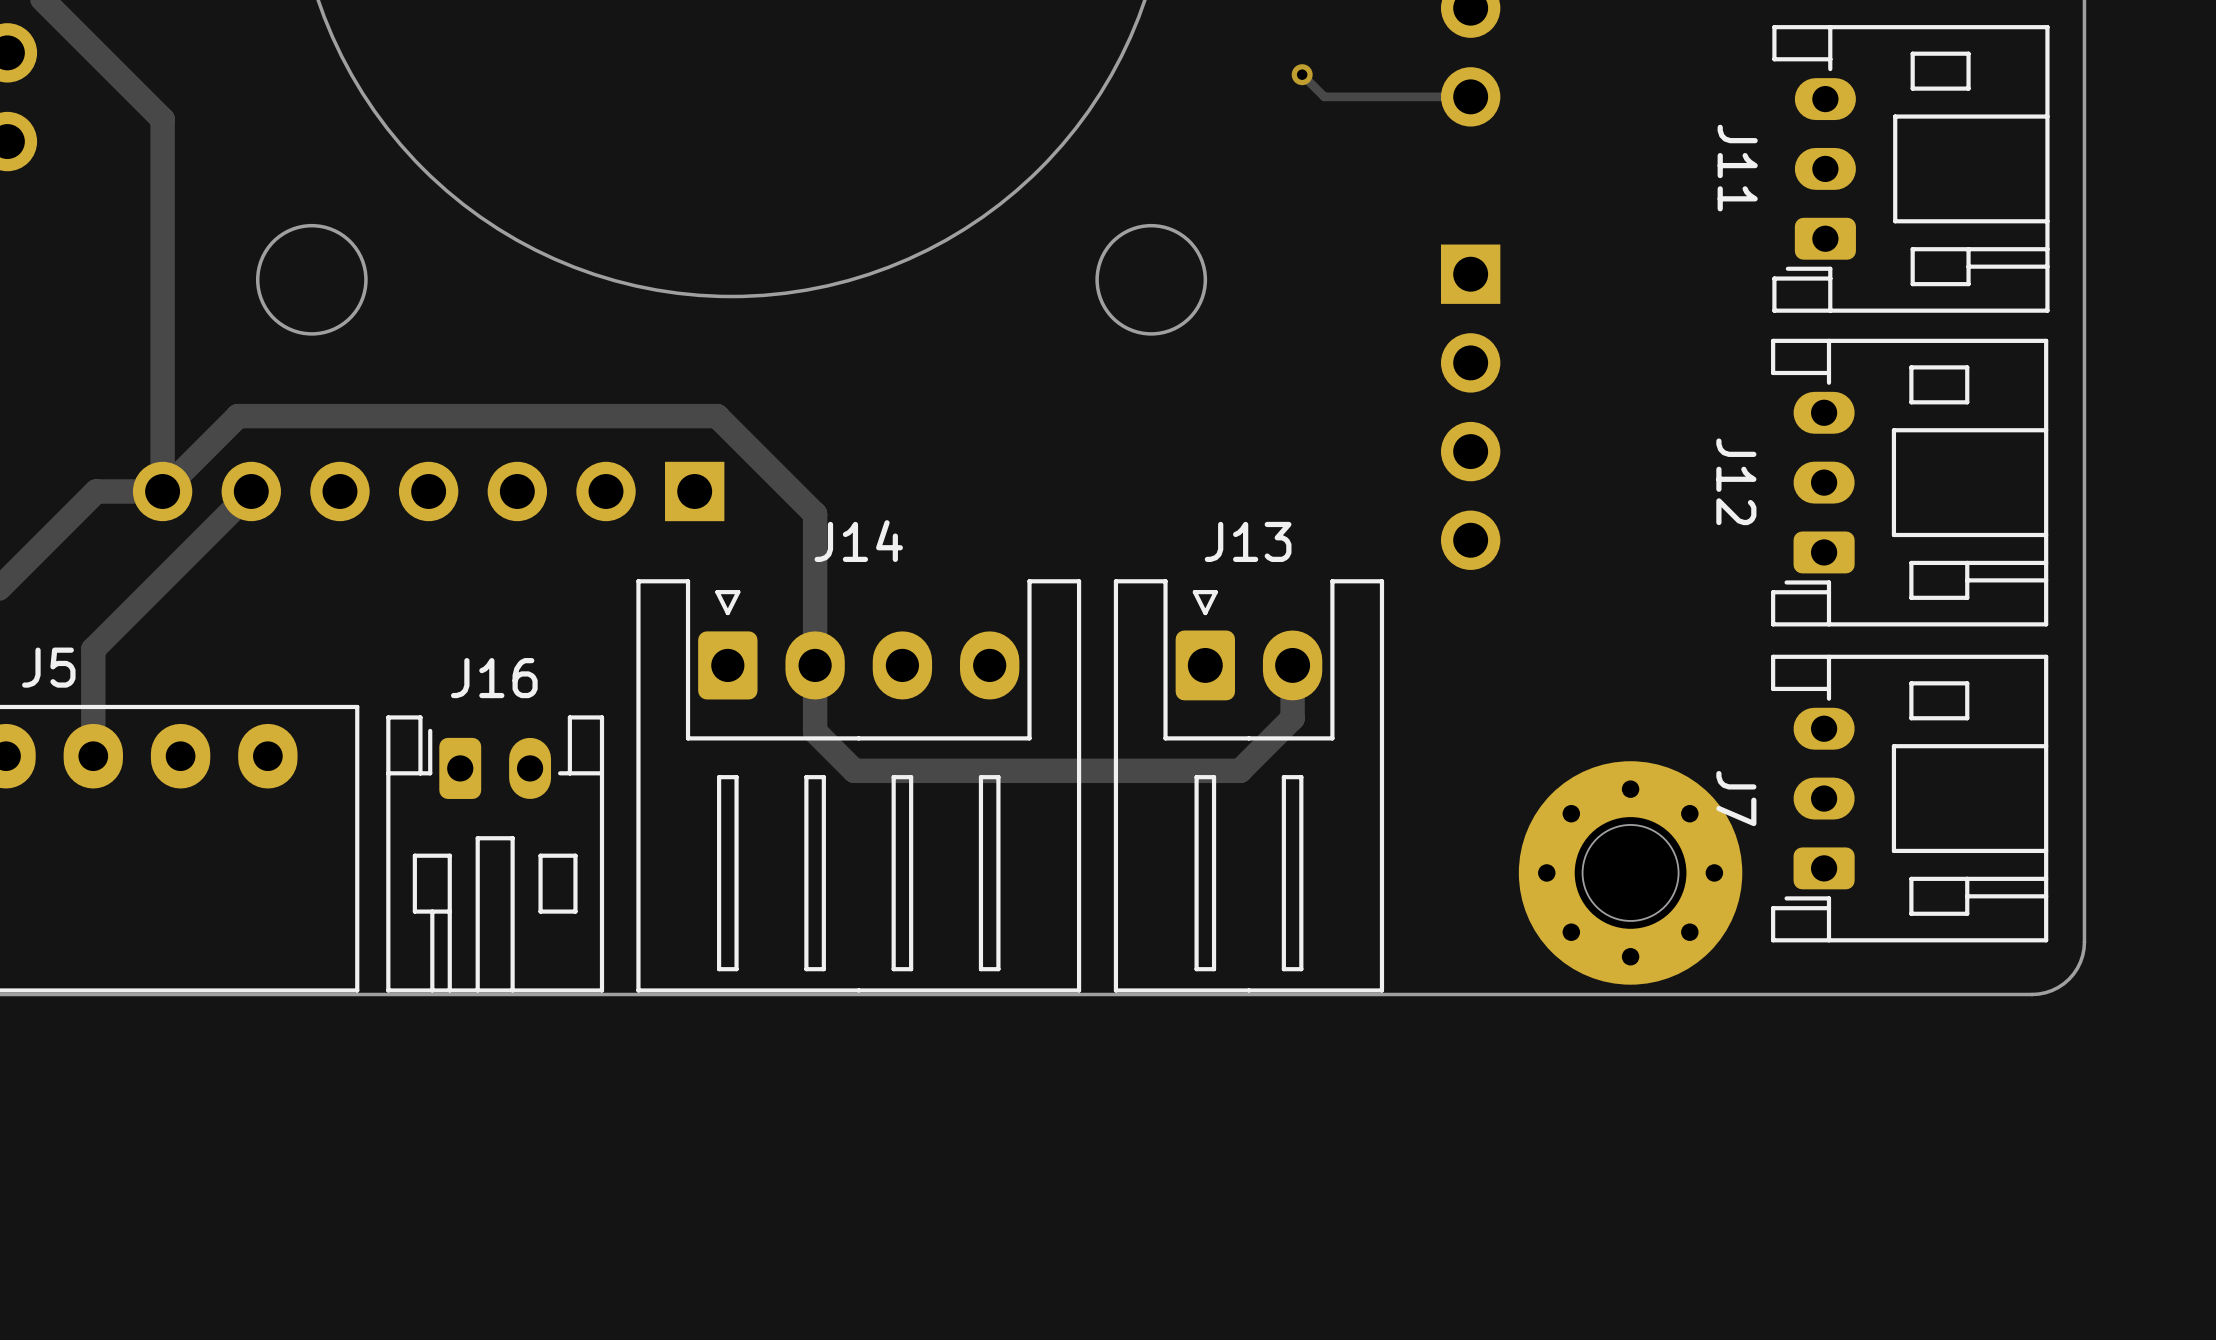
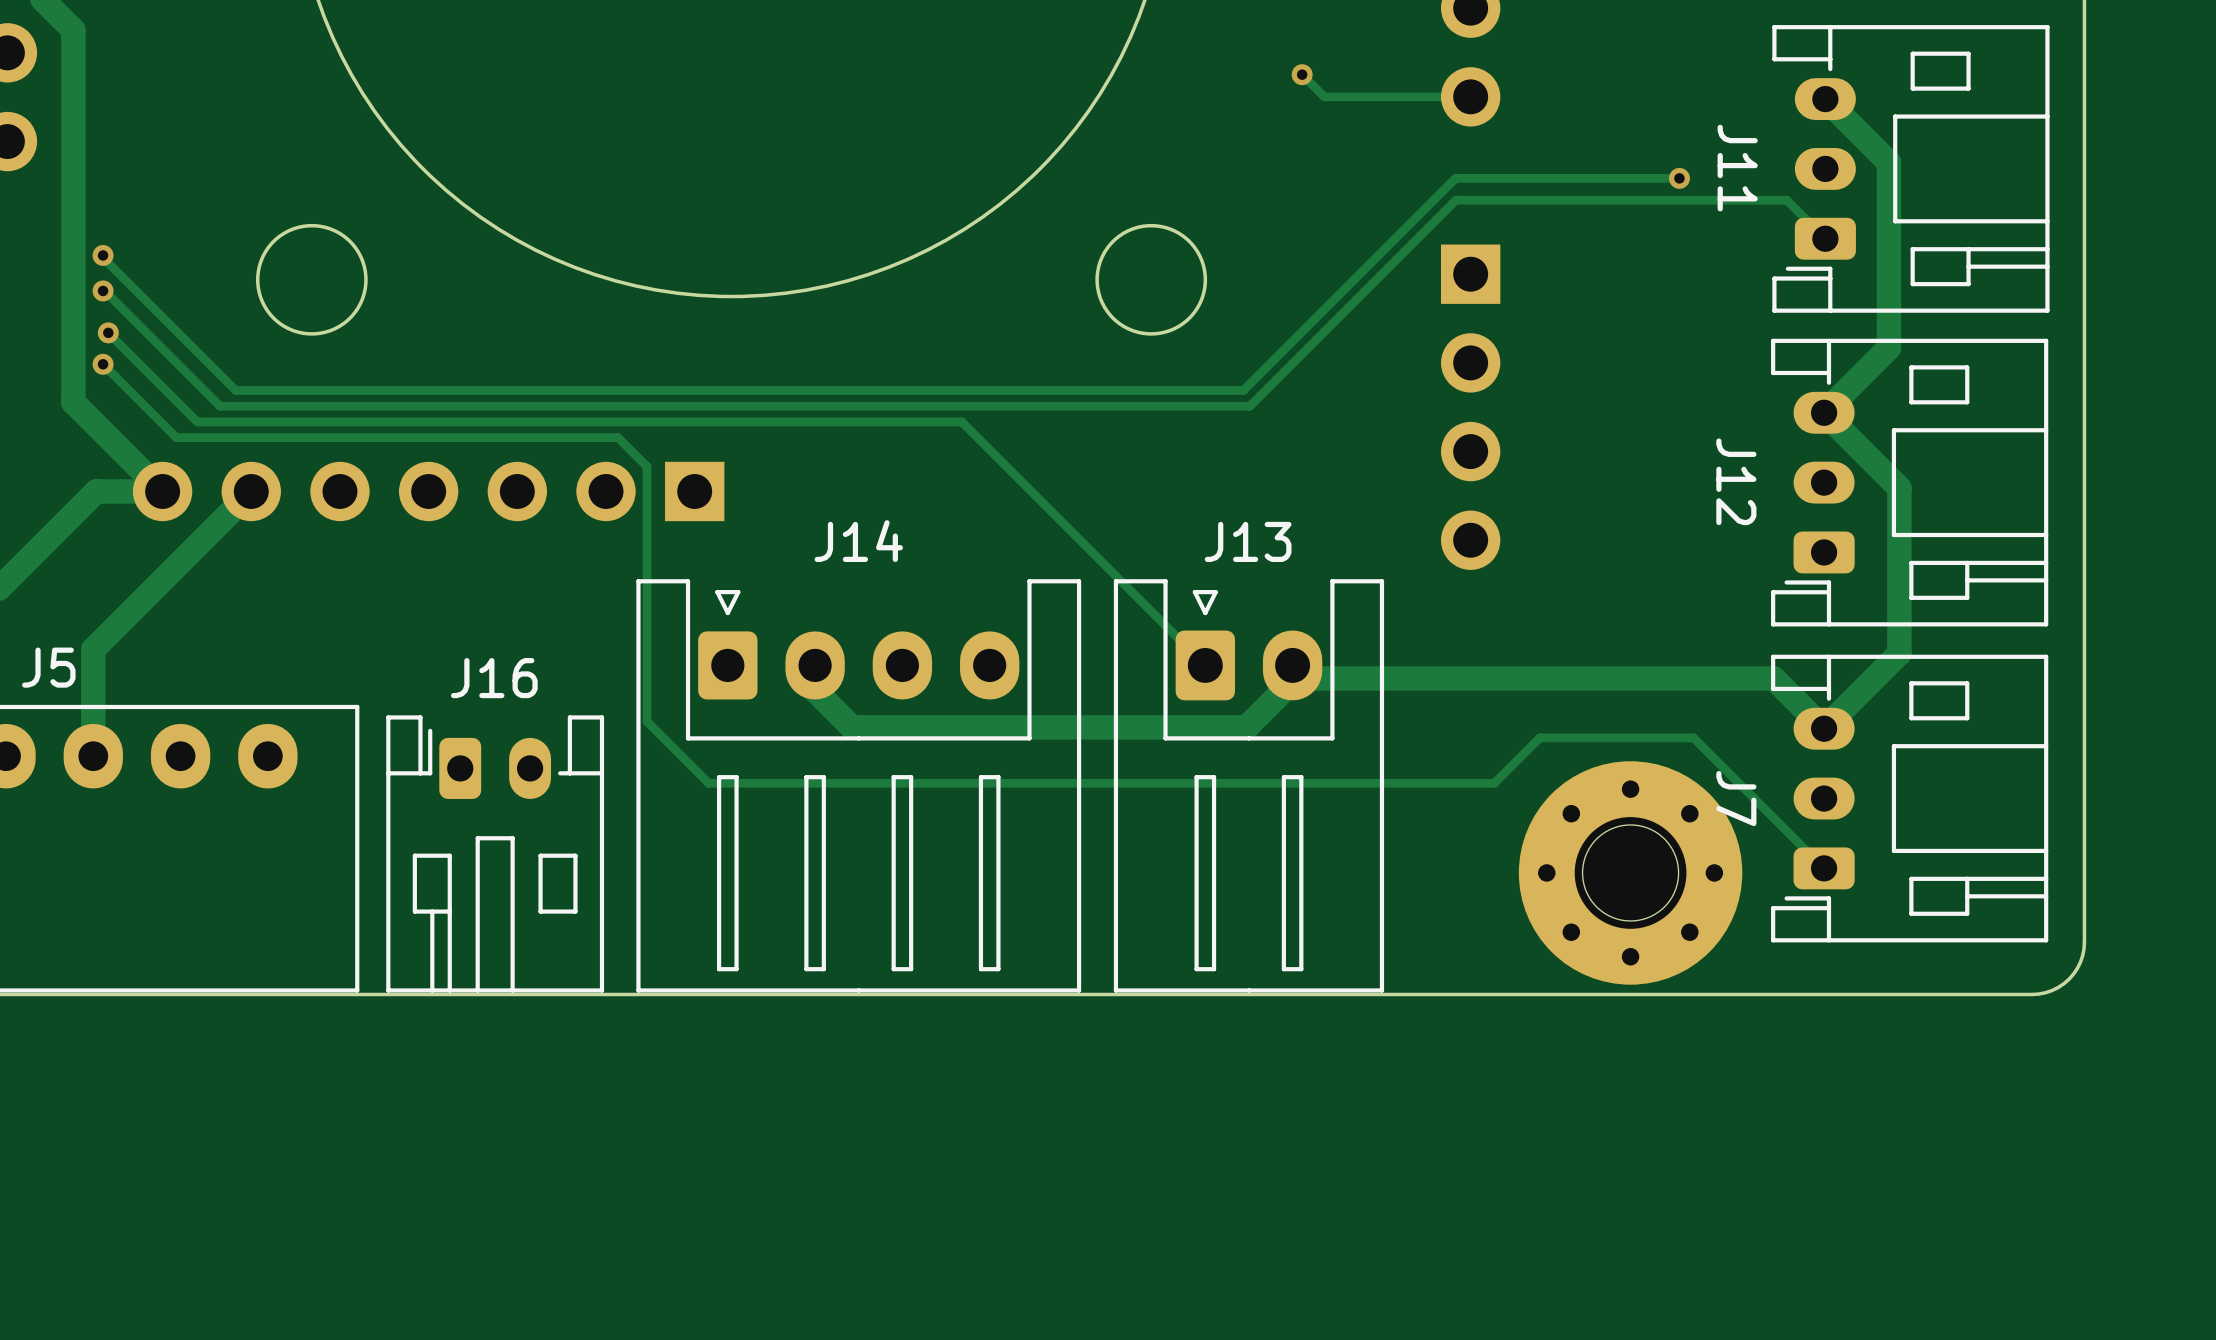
track: (73, 30) (162, 119) (162, 491) (237, 416) (717, 416) (815, 514) (815, 665) -> (73, 30) (73, 402) (162, 491)
track: none -> (1825, 99) (1888, 162) (1888, 347) (1824, 412) (1899, 488) (1899, 653) (1824, 728) (1773, 678) (1305, 678) (1292, 665)
track: none -> (1679, 178) (1455, 178) (1243, 390) (235, 390) (103, 257) (103, 255)
via: none -> (1679, 178)
track: none -> (1825, 238) (1786, 200) (1456, 200) (1250, 406) (220, 406) (103, 290)
via: none -> (103, 255)
via: none -> (103, 290)
track: none -> (108, 332) (197, 421) (961, 421) (1205, 665)
via: none -> (108, 332)
track: none -> (103, 364) (176, 437) (618, 437) (647, 466) (647, 721) (708, 783) (1494, 783) (1539, 737) (1693, 737) (1824, 868)
via: none -> (103, 364)
track: (1292, 681) (1292, 718) (1240, 770) (854, 770) (815, 731) (815, 690) -> (1292, 681) (1246, 727) (851, 727) (815, 690)

